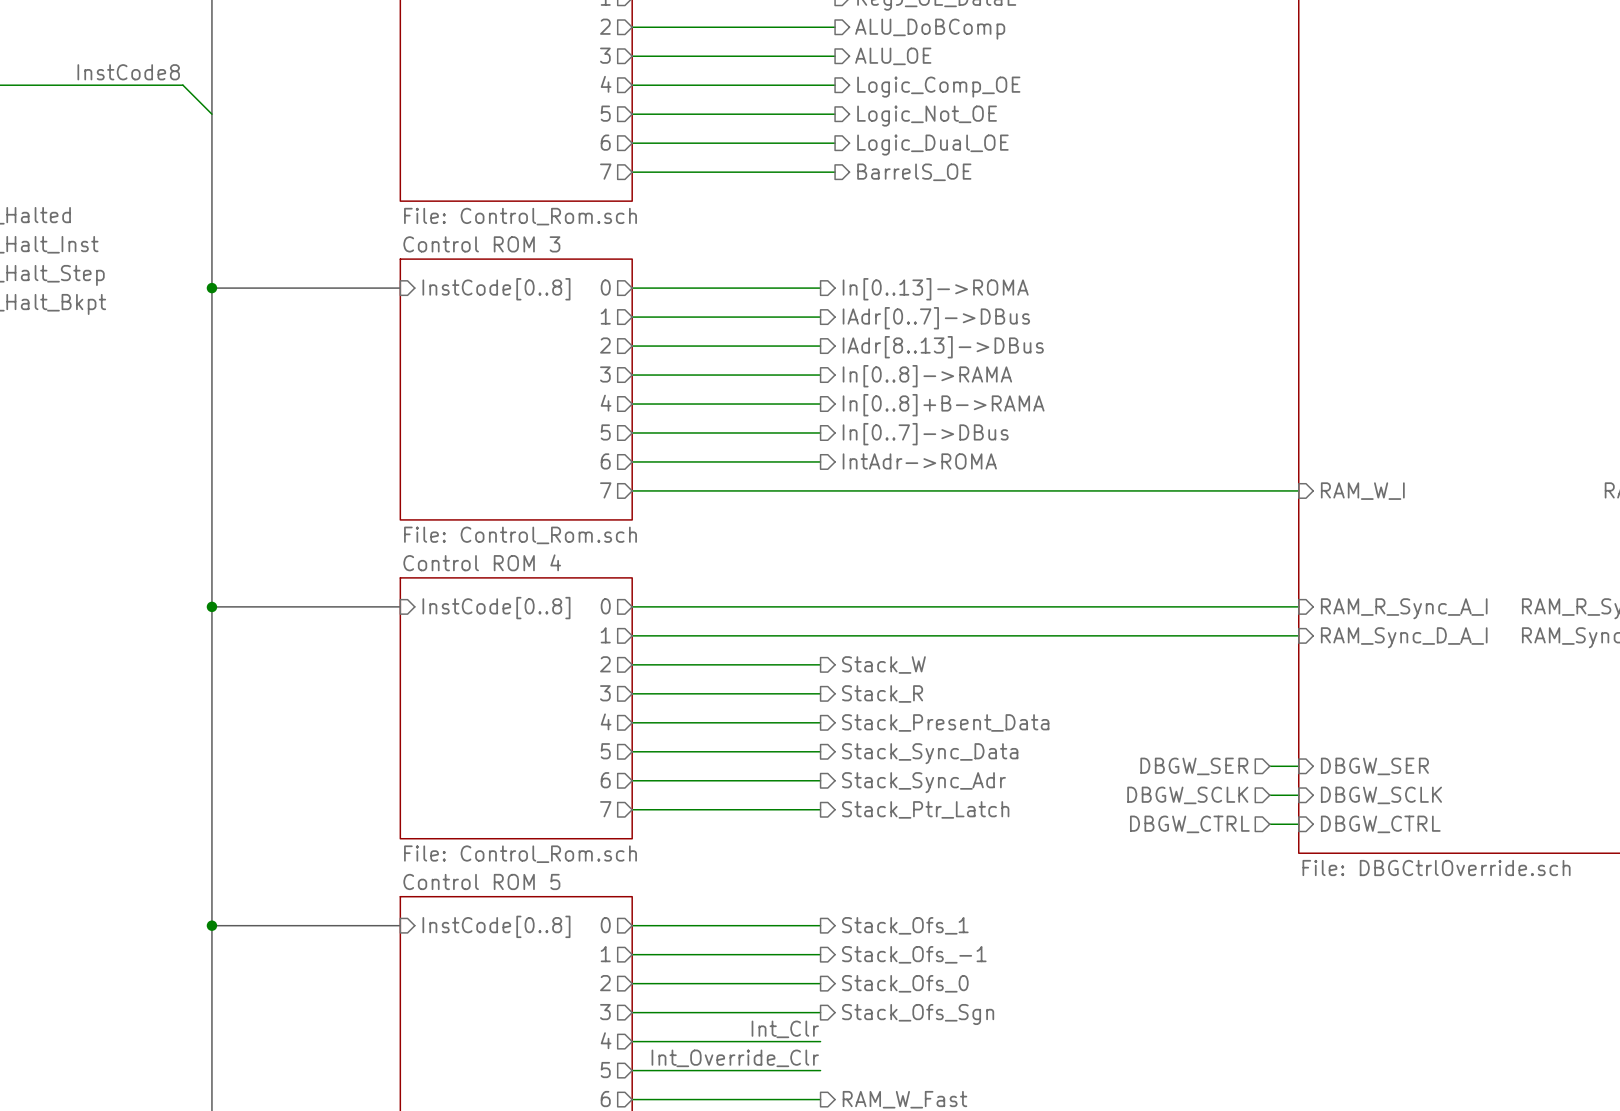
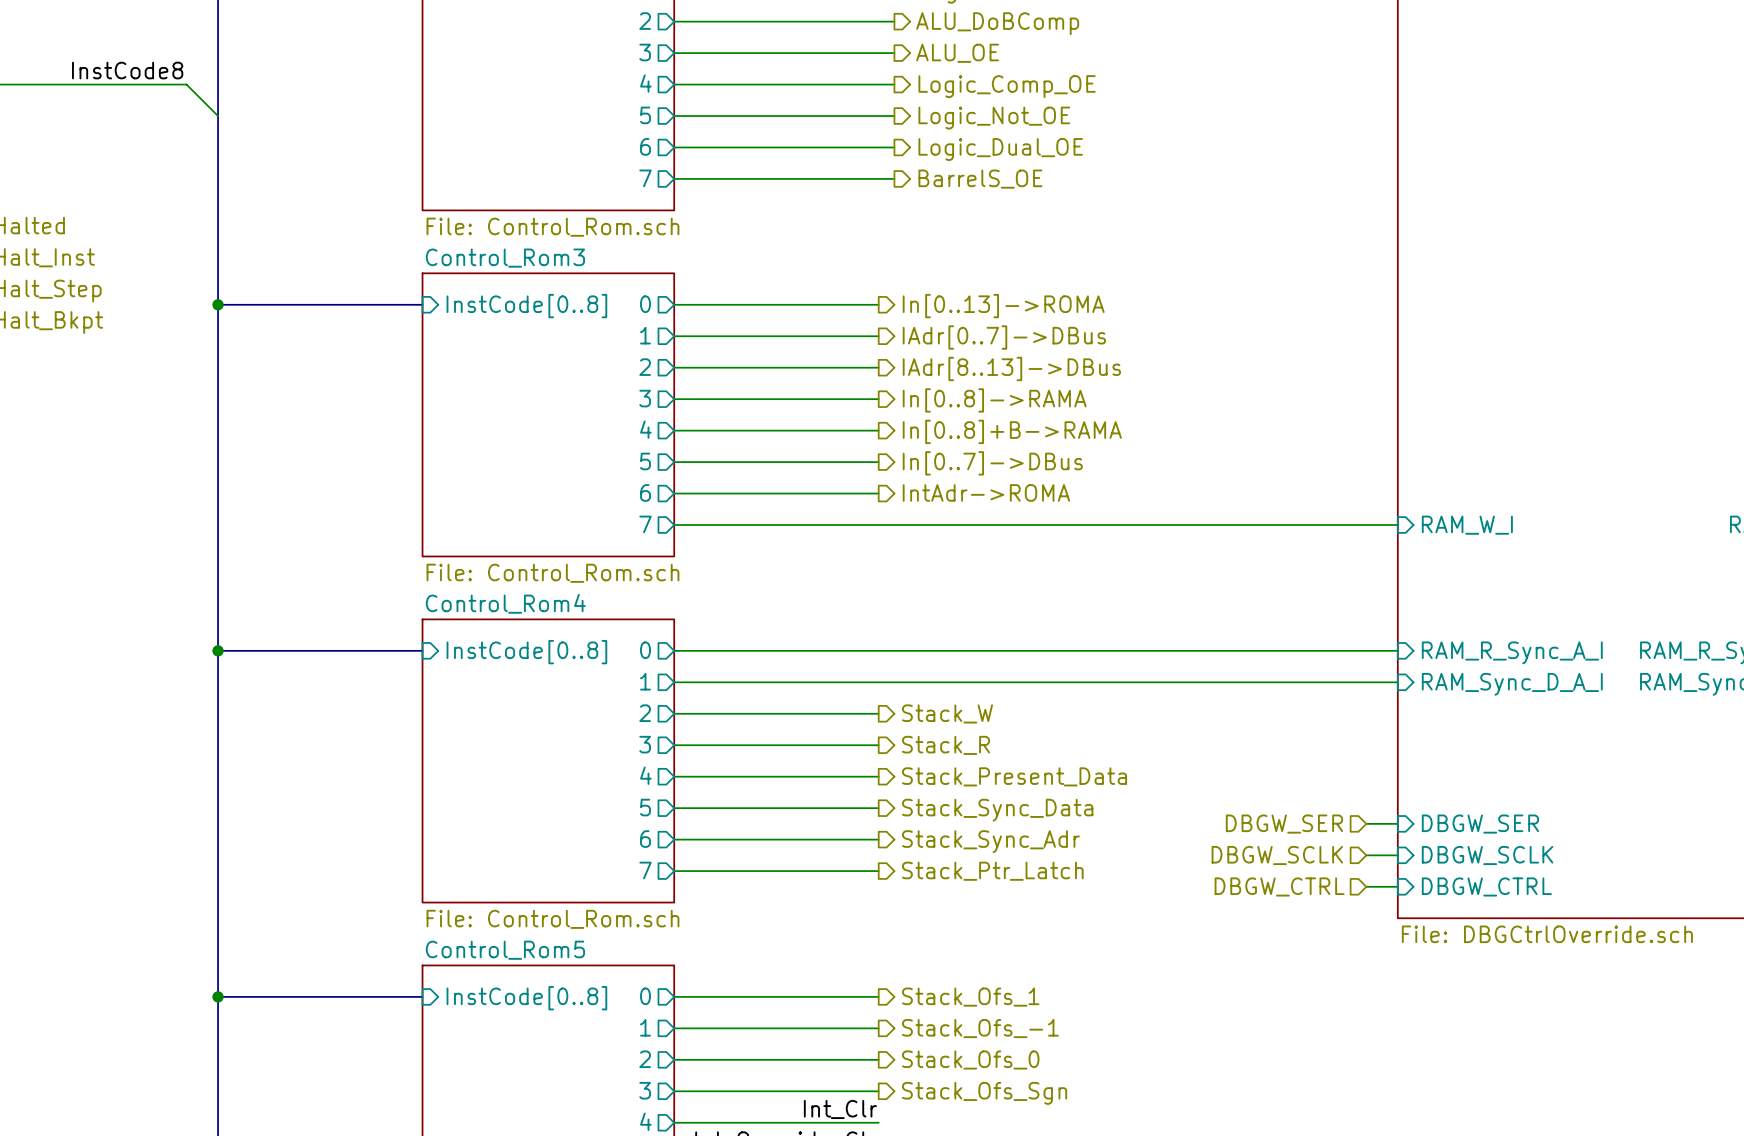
sheet Control ROM 3 name: Control ROM 3 (481, 244) -> Control_Rom3 (505, 258)
sheet Control ROM 4 name: Control ROM 4 (482, 562) -> Control_Rom4 (505, 603)
sheet Control ROM 5 name: Control ROM 5 (481, 881) -> Control_Rom5 (505, 950)

